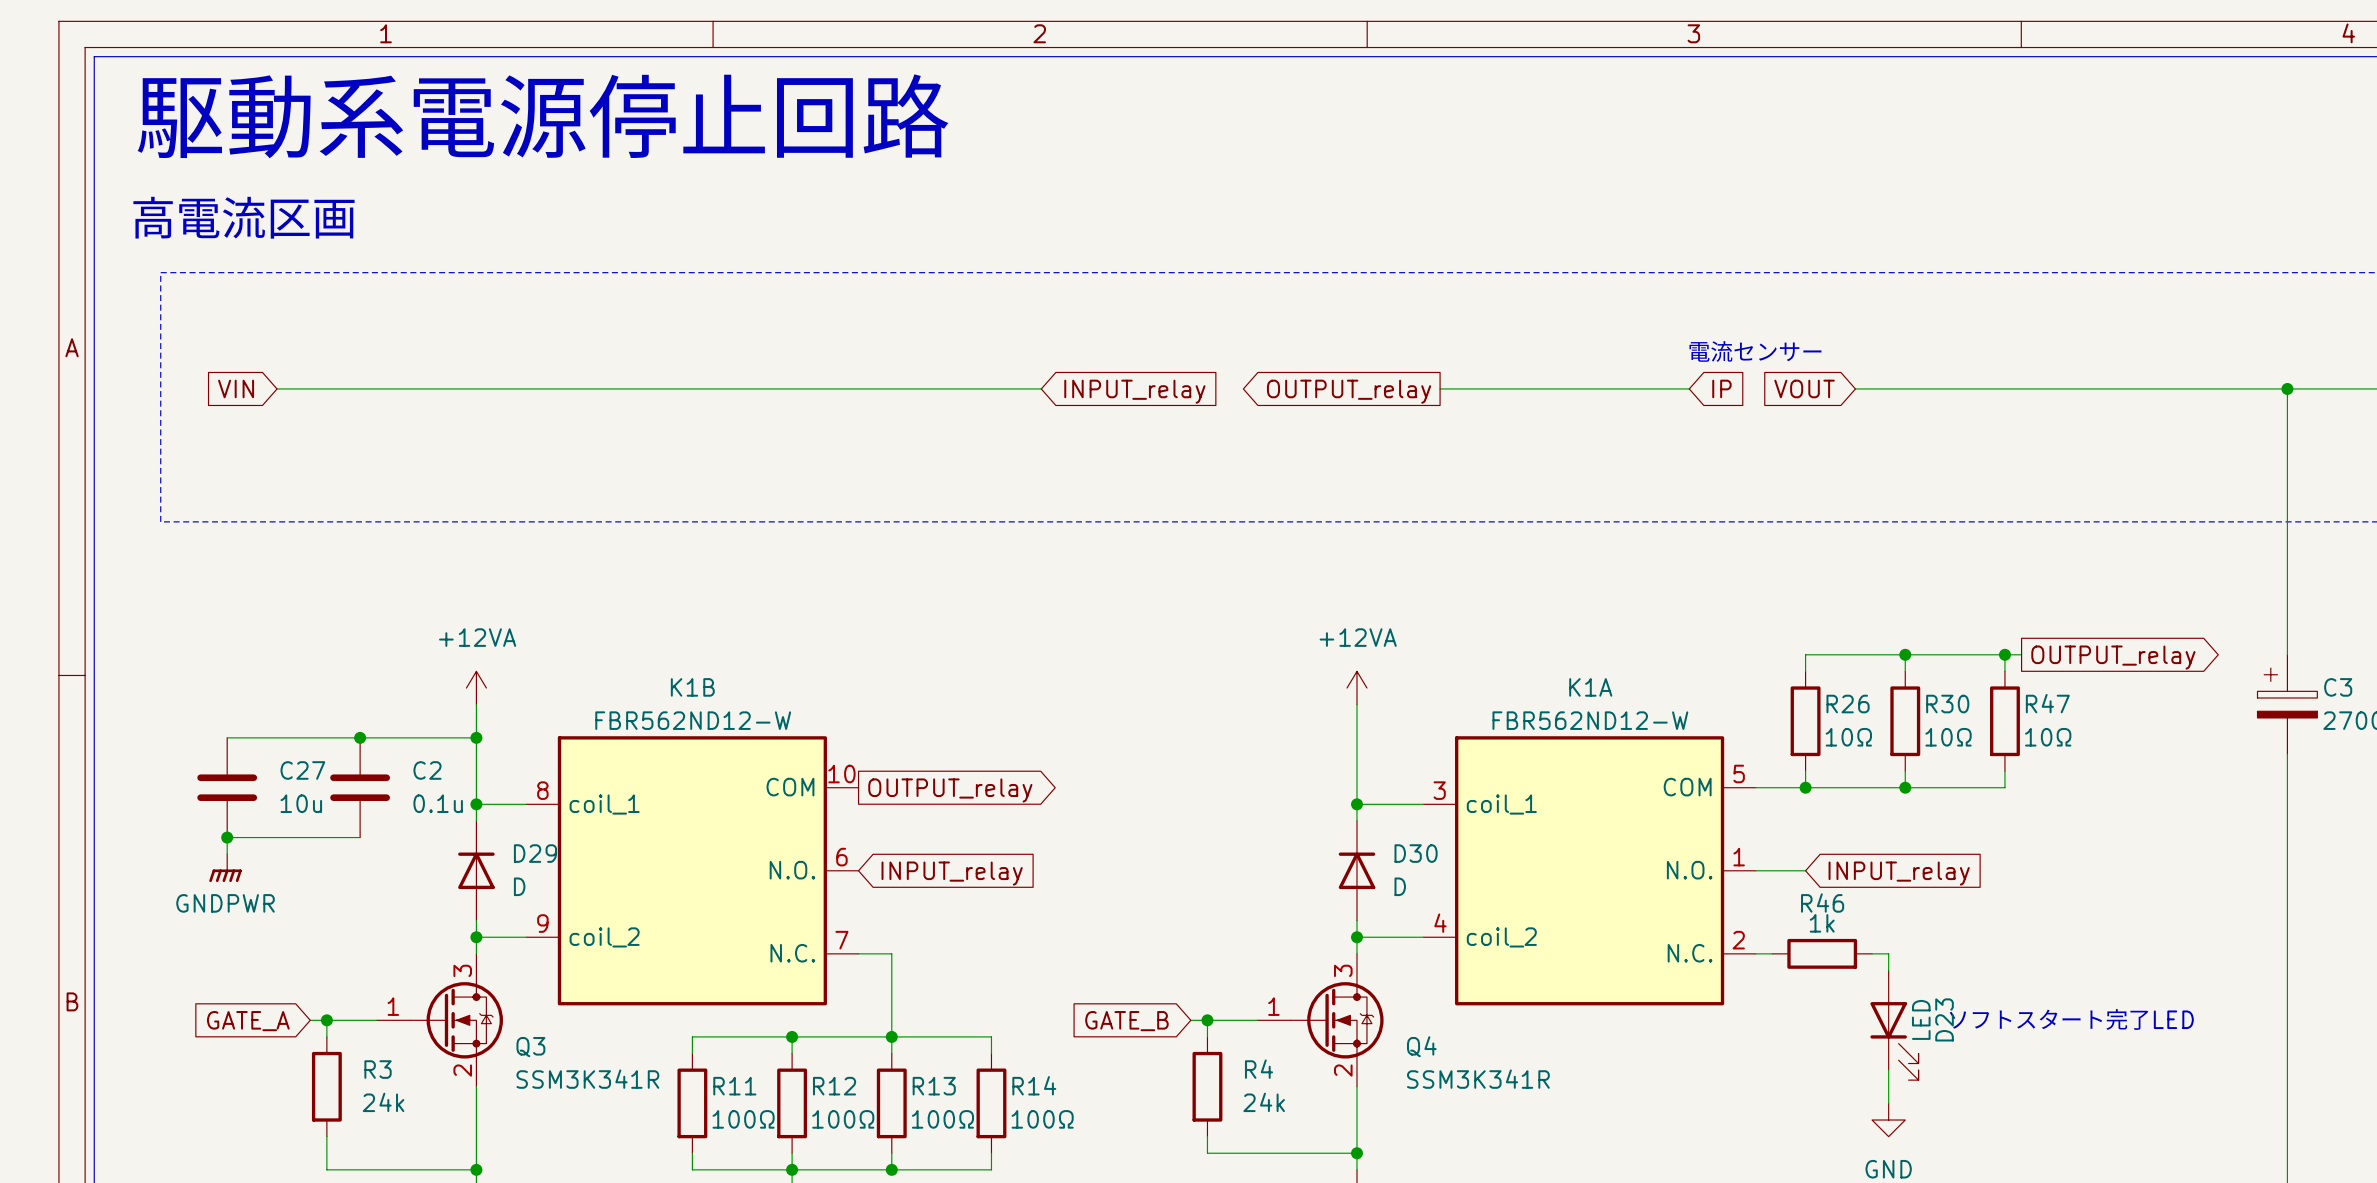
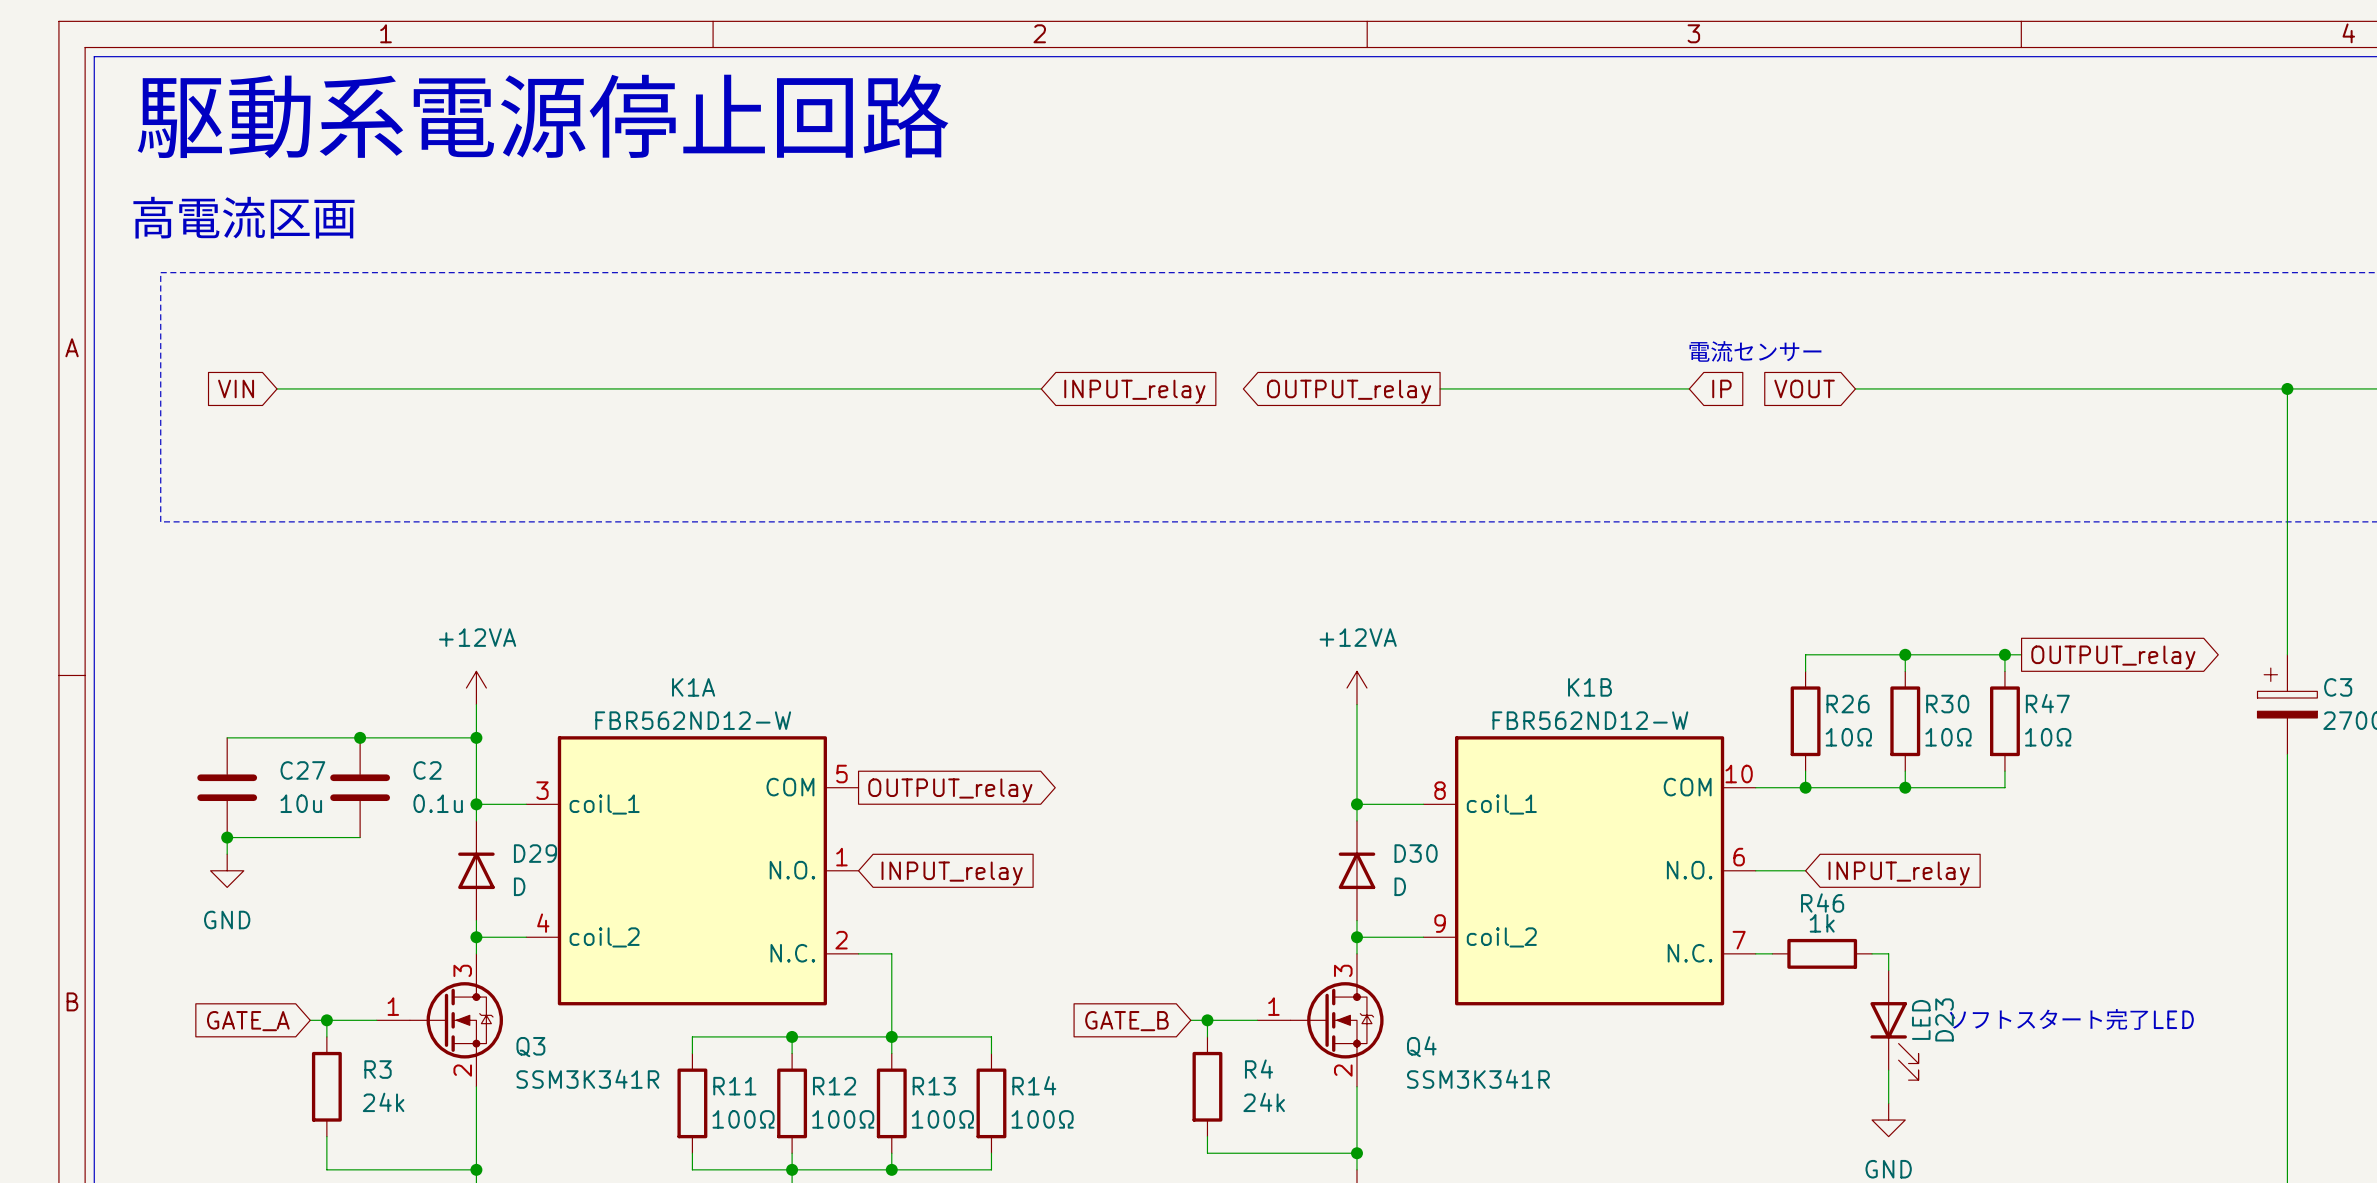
power symbol: GNDPWR (225, 868) -> GND (227, 870)
K1B position: (692, 870) -> (1589, 870)
K1A position: (1589, 870) -> (692, 870)

